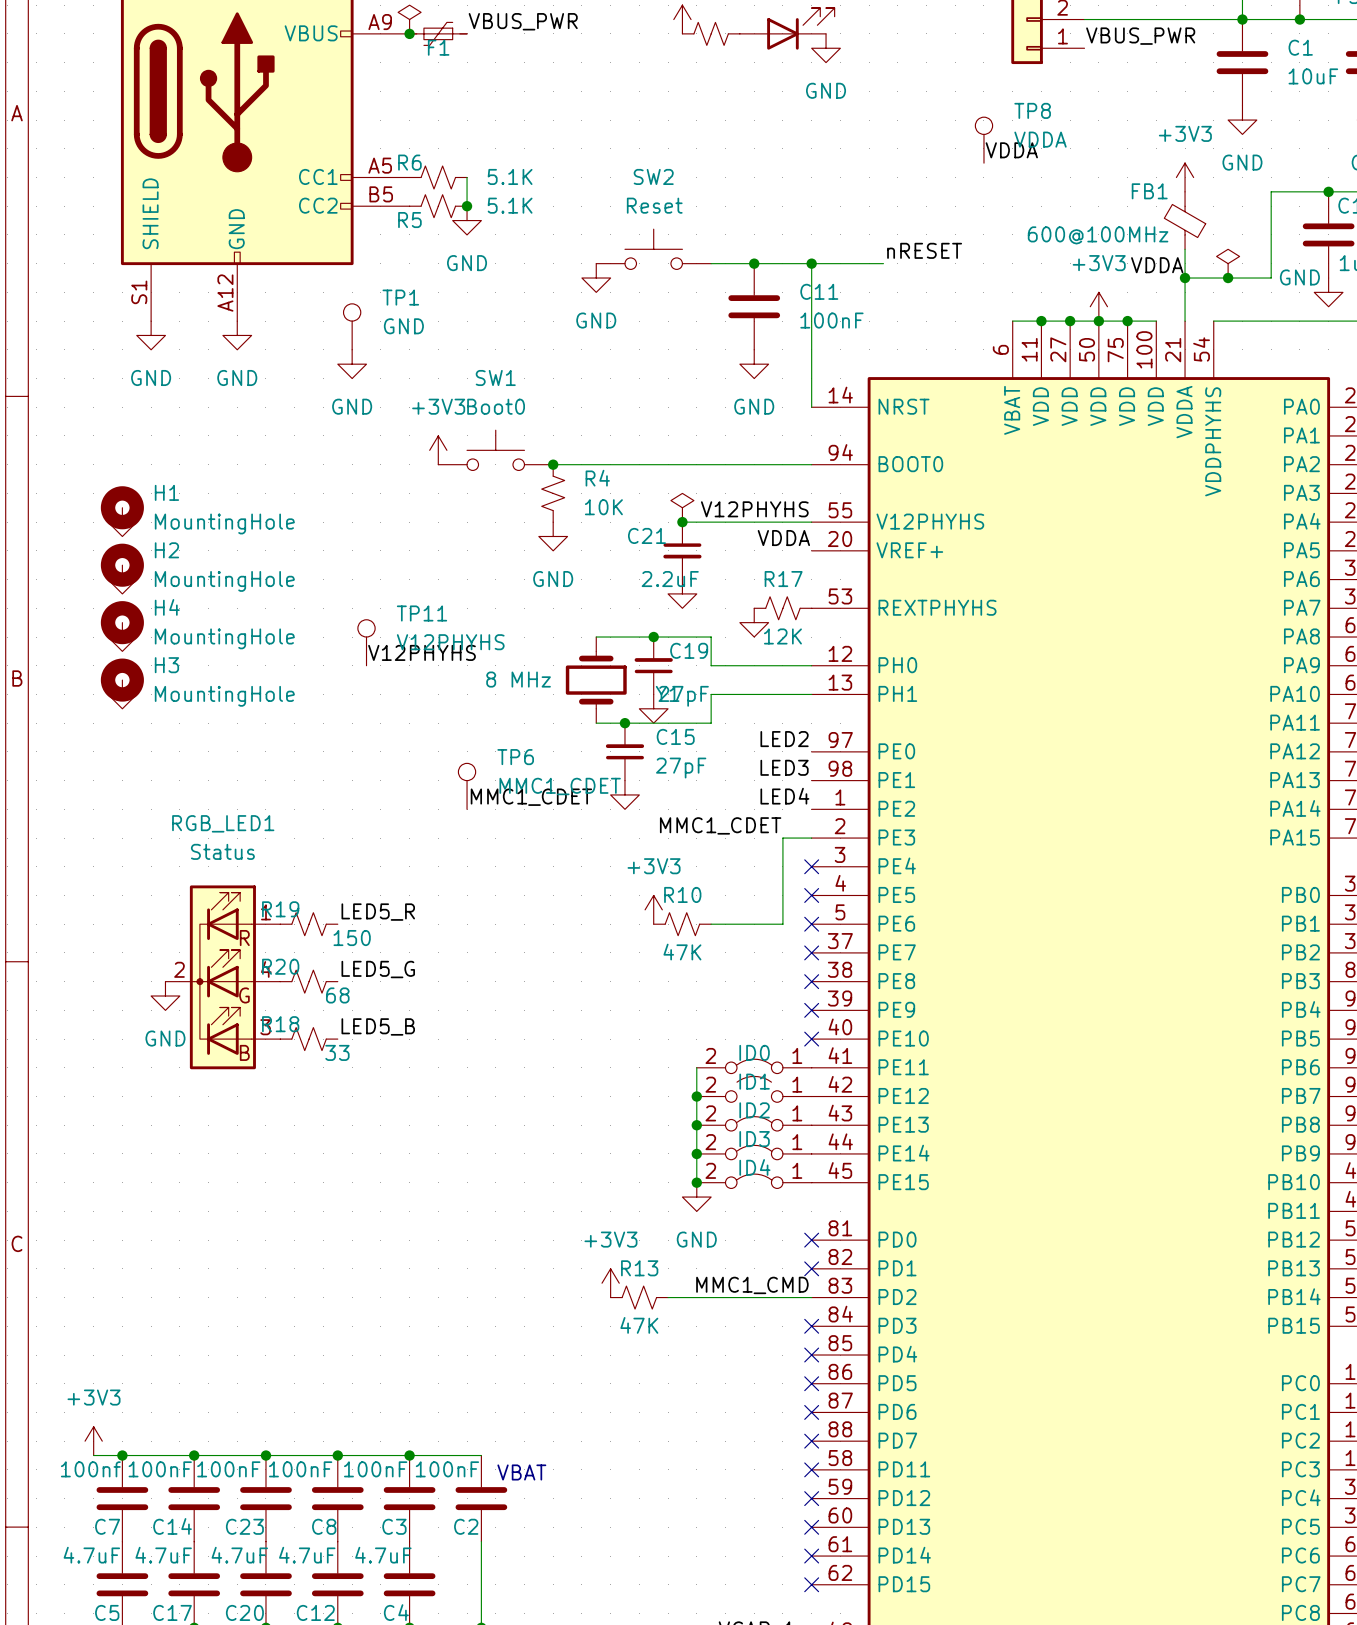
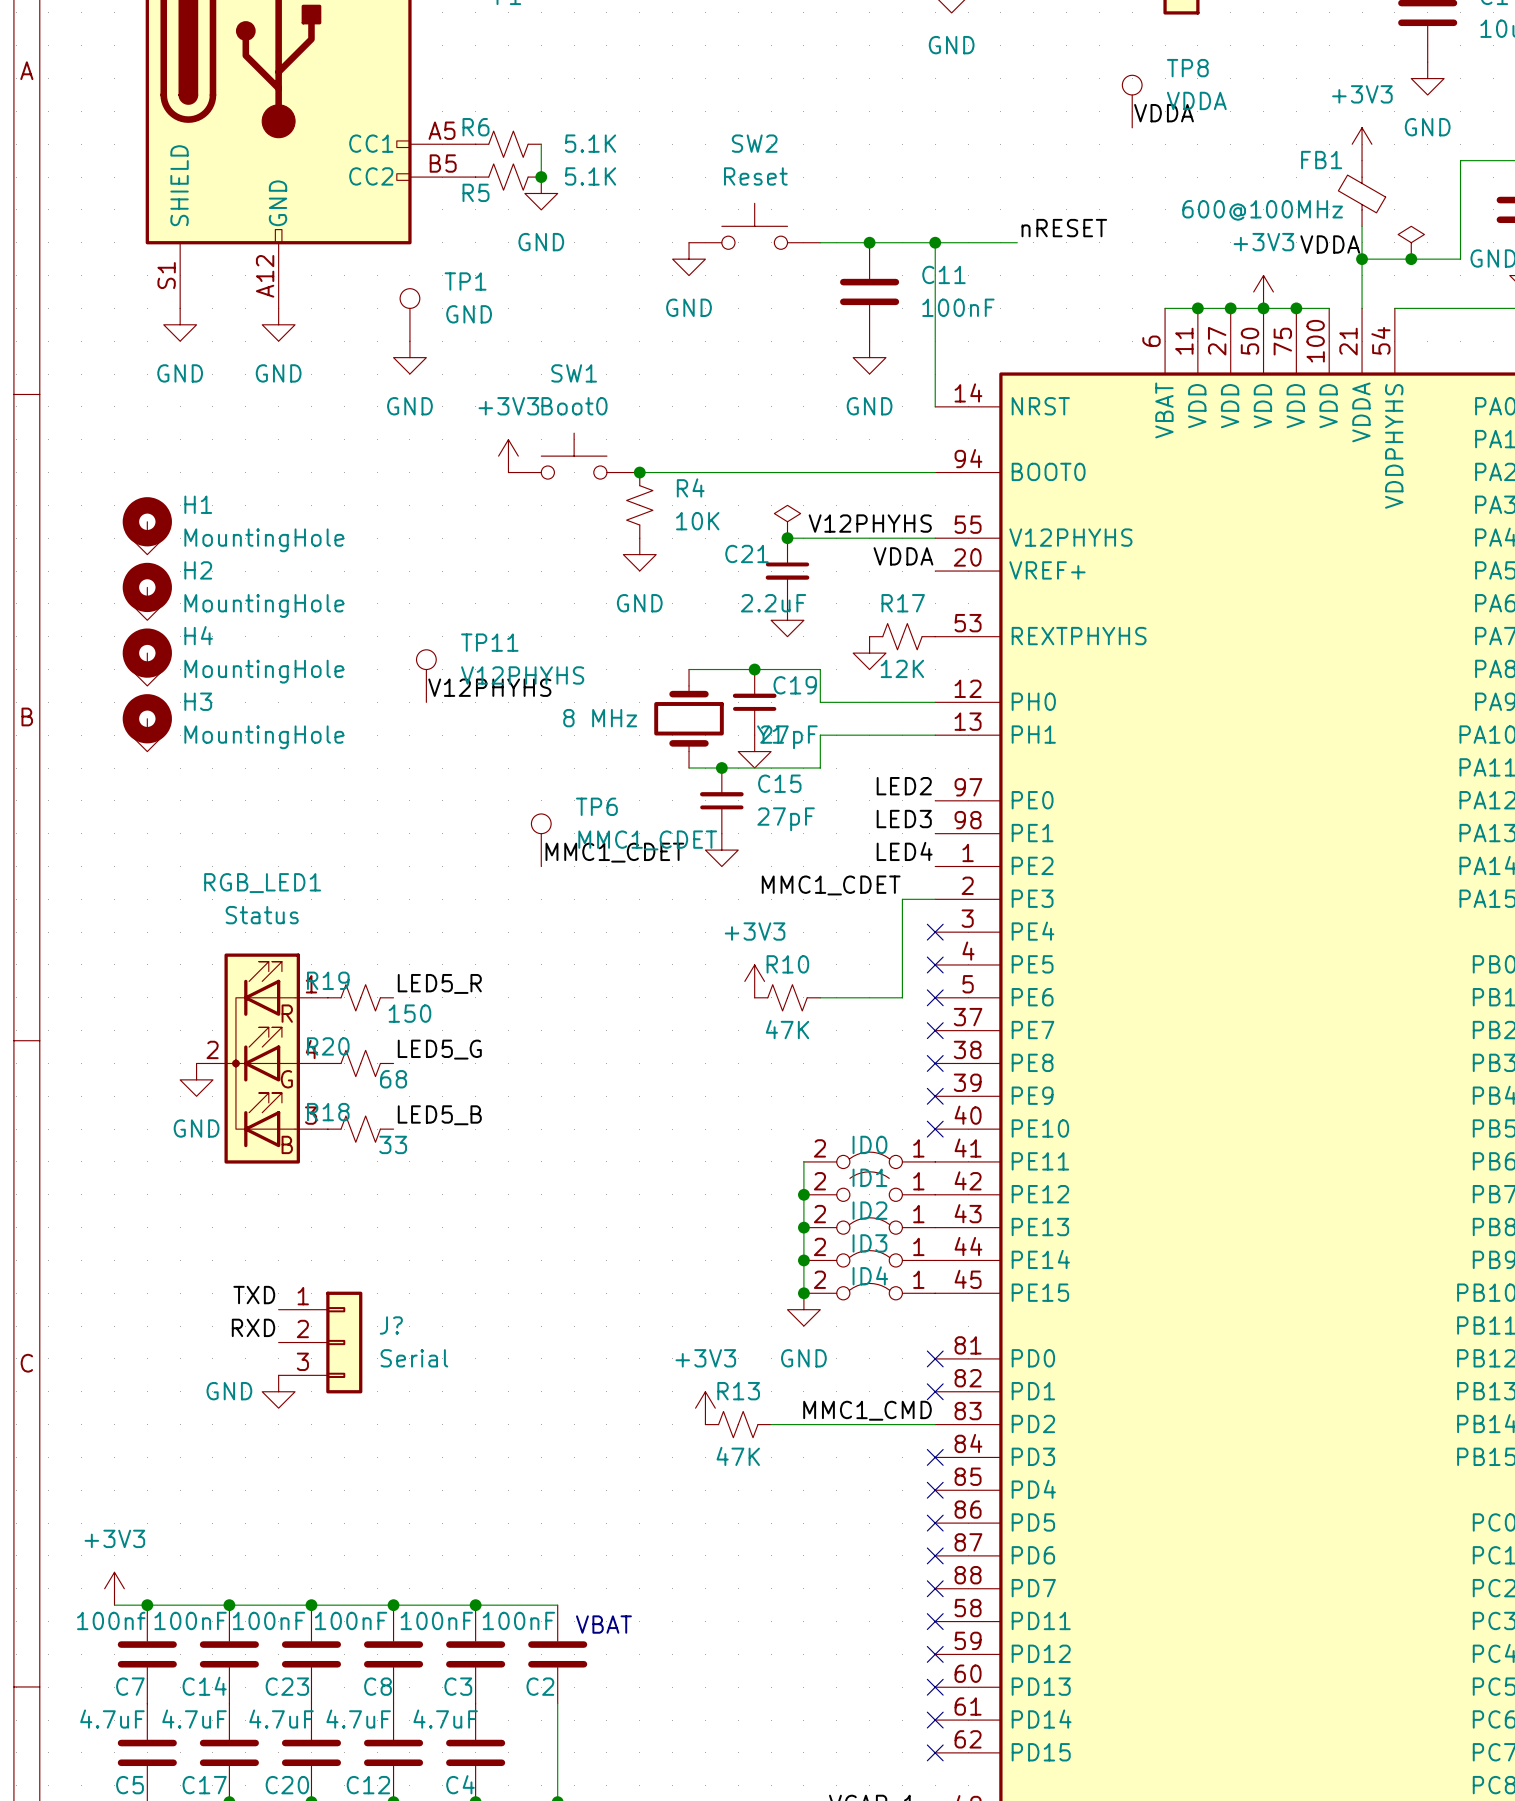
label: none -> TXD (254, 1295)
label: none -> RXD (253, 1327)
J?: none -> Serial (320, 1342)
power symbol: none -> GND (278, 1391)

